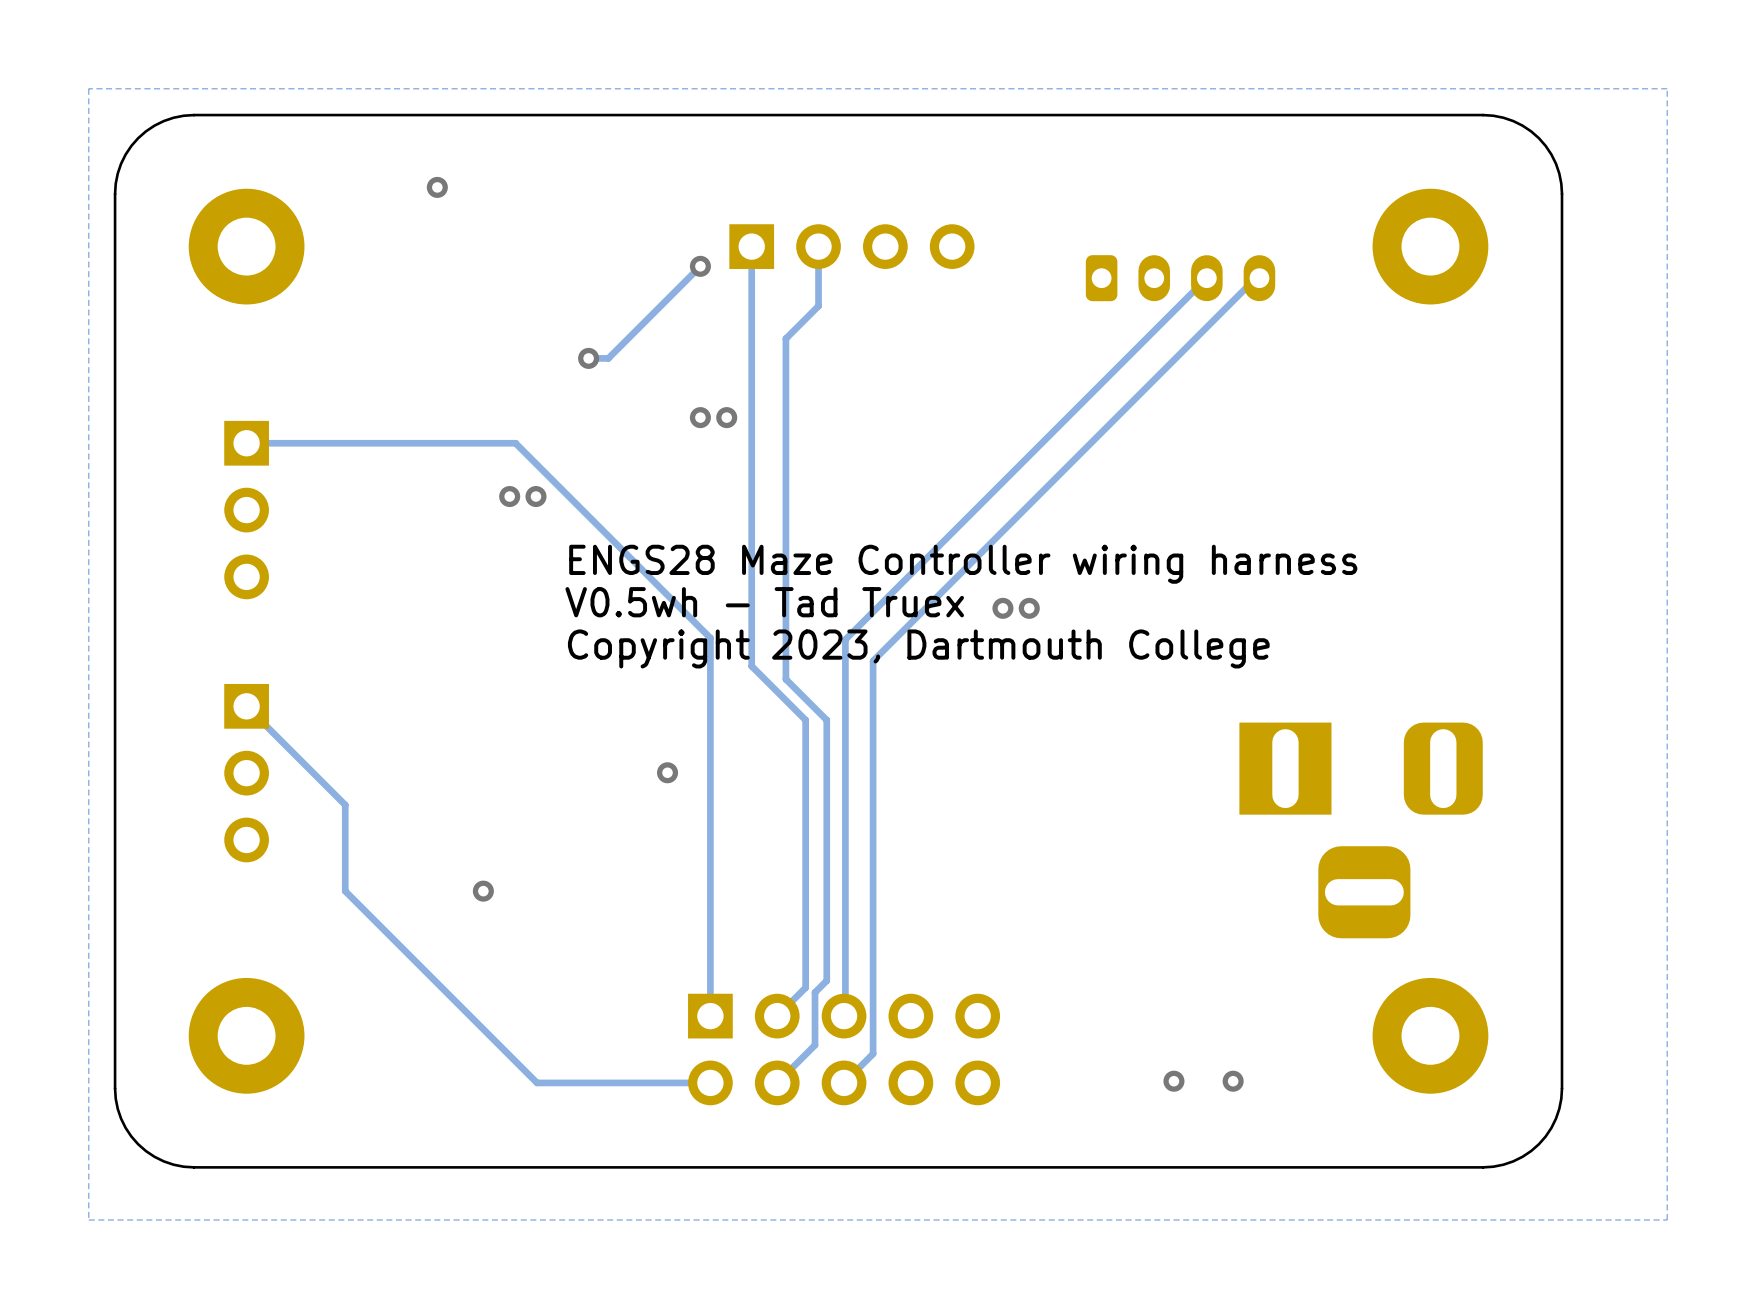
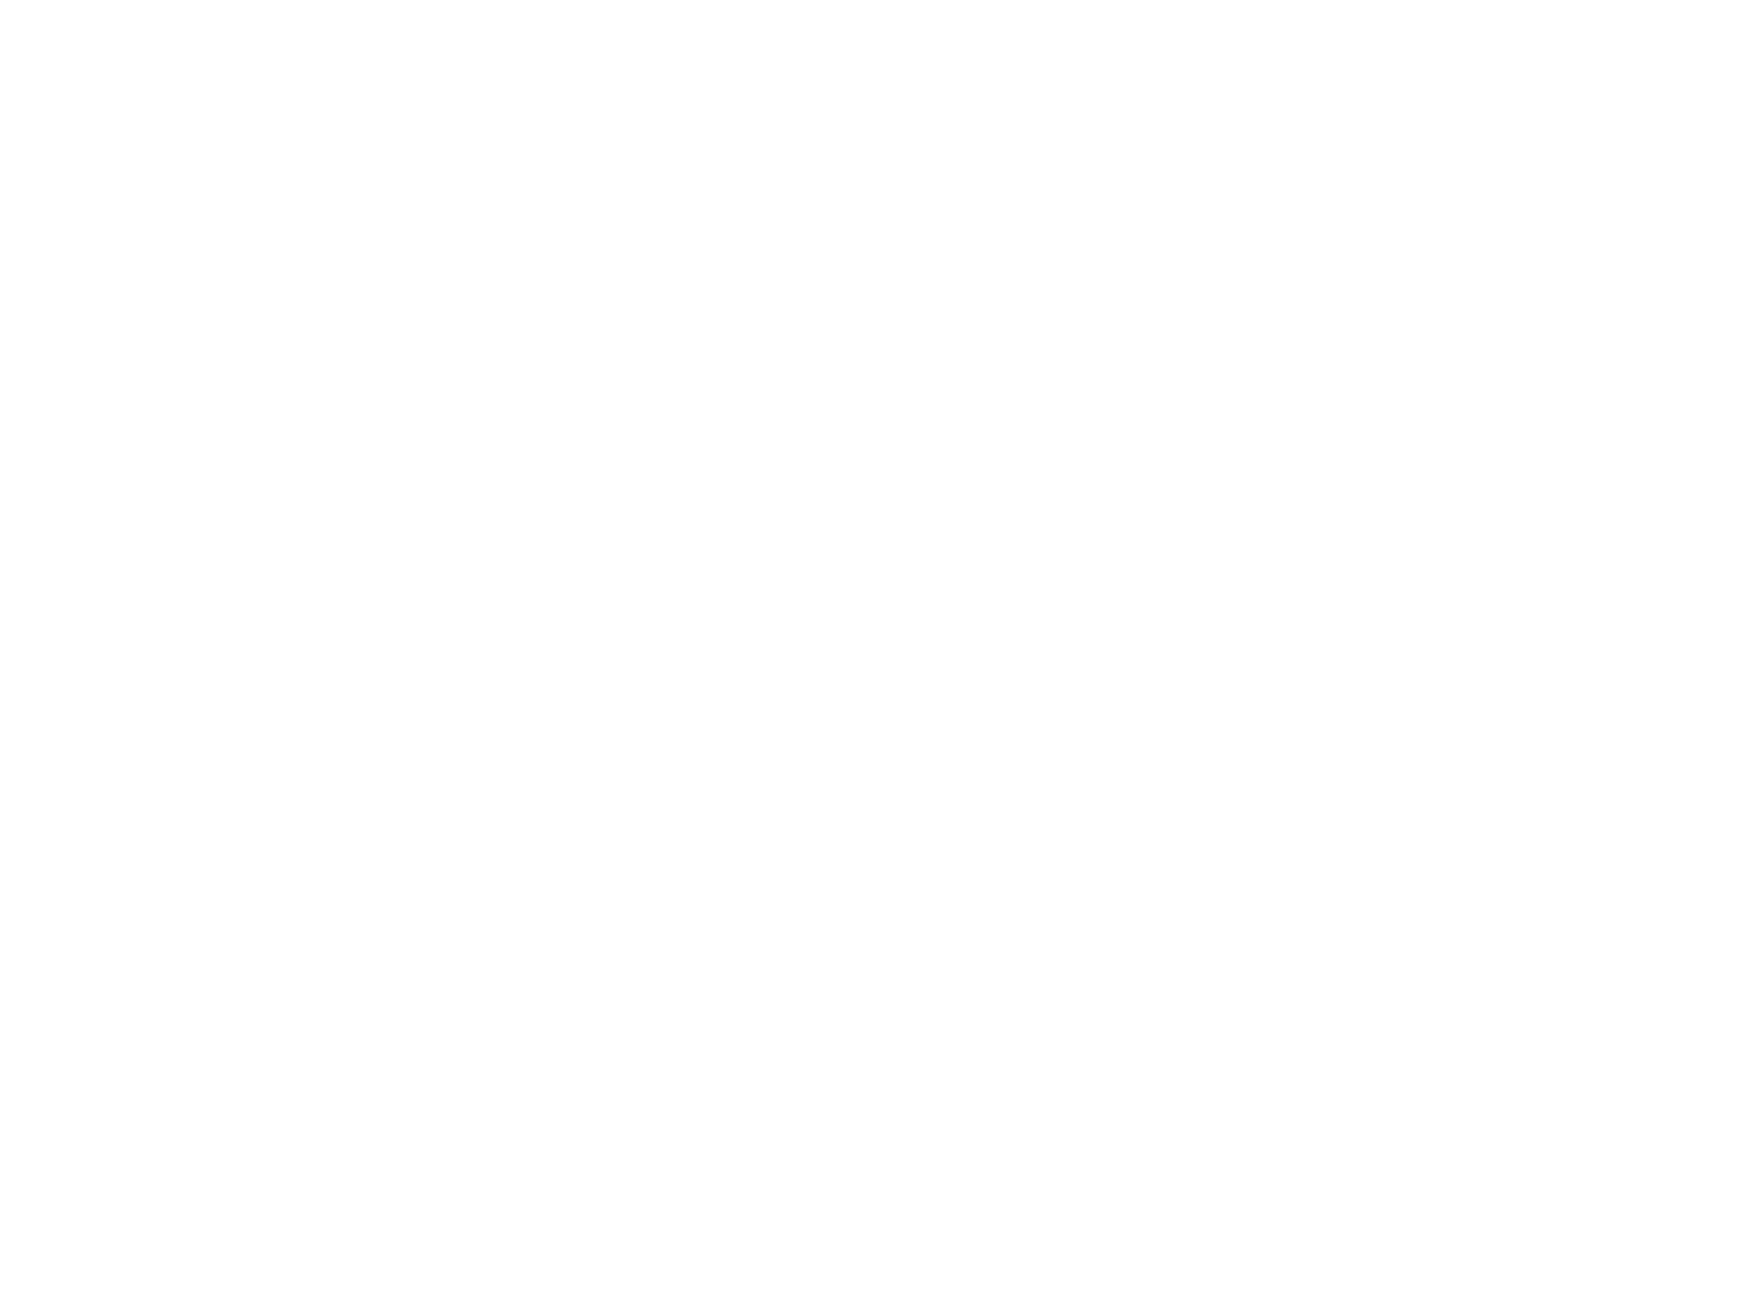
zone outline: (1667, 88) (1667, 1219) (88, 1219) (88, 88) (1667, 88) -> none
board edge: (1483, 115) (193, 115) (163, 121) (145, 131) (131, 145) (121, 163) (115, 193) (115, 1088) (121, 1118) (131, 1136) (154, 1156) (173, 1164) (193, 1167) (1483, 1167) (1513, 1161) (1531, 1151) (1545, 1136) (1555, 1118) (1561, 1088) (1561, 193) (1555, 163) (1538, 138) (1513, 121) (1483, 115) -> none
via: (437, 187) -> none
part: (246, 246) -> none
track: (751, 246) (751, 666) (805, 720) (805, 987) (777, 1016) -> none
track: (818, 246) (818, 306) (785, 338) (785, 679) (826, 720) (826, 980) (815, 992) (815, 1045) (777, 1082) -> none
part: (851, 246) -> none
part: (1430, 246) -> none
track: (700, 266) (608, 358) (588, 358) -> none
via: (700, 266) -> none
part: (1180, 278) -> none
track: (1206, 278) (845, 639) (844, 1016) -> none
track: (1259, 278) (1255, 278) (873, 660) (873, 1053) (844, 1082) -> none
via: (588, 358) -> none
via: (700, 417) -> none
via: (726, 417) -> none
track: (246, 443) (515, 443) (710, 638) (710, 1016) -> none
via: (509, 496) -> none
via: (535, 496) -> none
part: (246, 510) -> none
text: ENGS28 Maze Controller wiring harness (963, 564) -> none
text: V0.5wh - Tad Truex (764, 602) -> none
via: (1002, 608) -> none
via: (1029, 608) -> none
text: Copyright 2023, Dartmouth College (918, 648) -> none
track: (246, 706) (345, 804) (345, 891) (537, 1082) (710, 1082) -> none
via: (667, 772) -> none
part: (246, 773) -> none
part: (1361, 830) -> none
via: (483, 891) -> none
part: (246, 1035) -> none
part: (1430, 1035) -> none
part: (844, 1049) -> none
via: (1173, 1081) -> none
via: (1233, 1081) -> none

